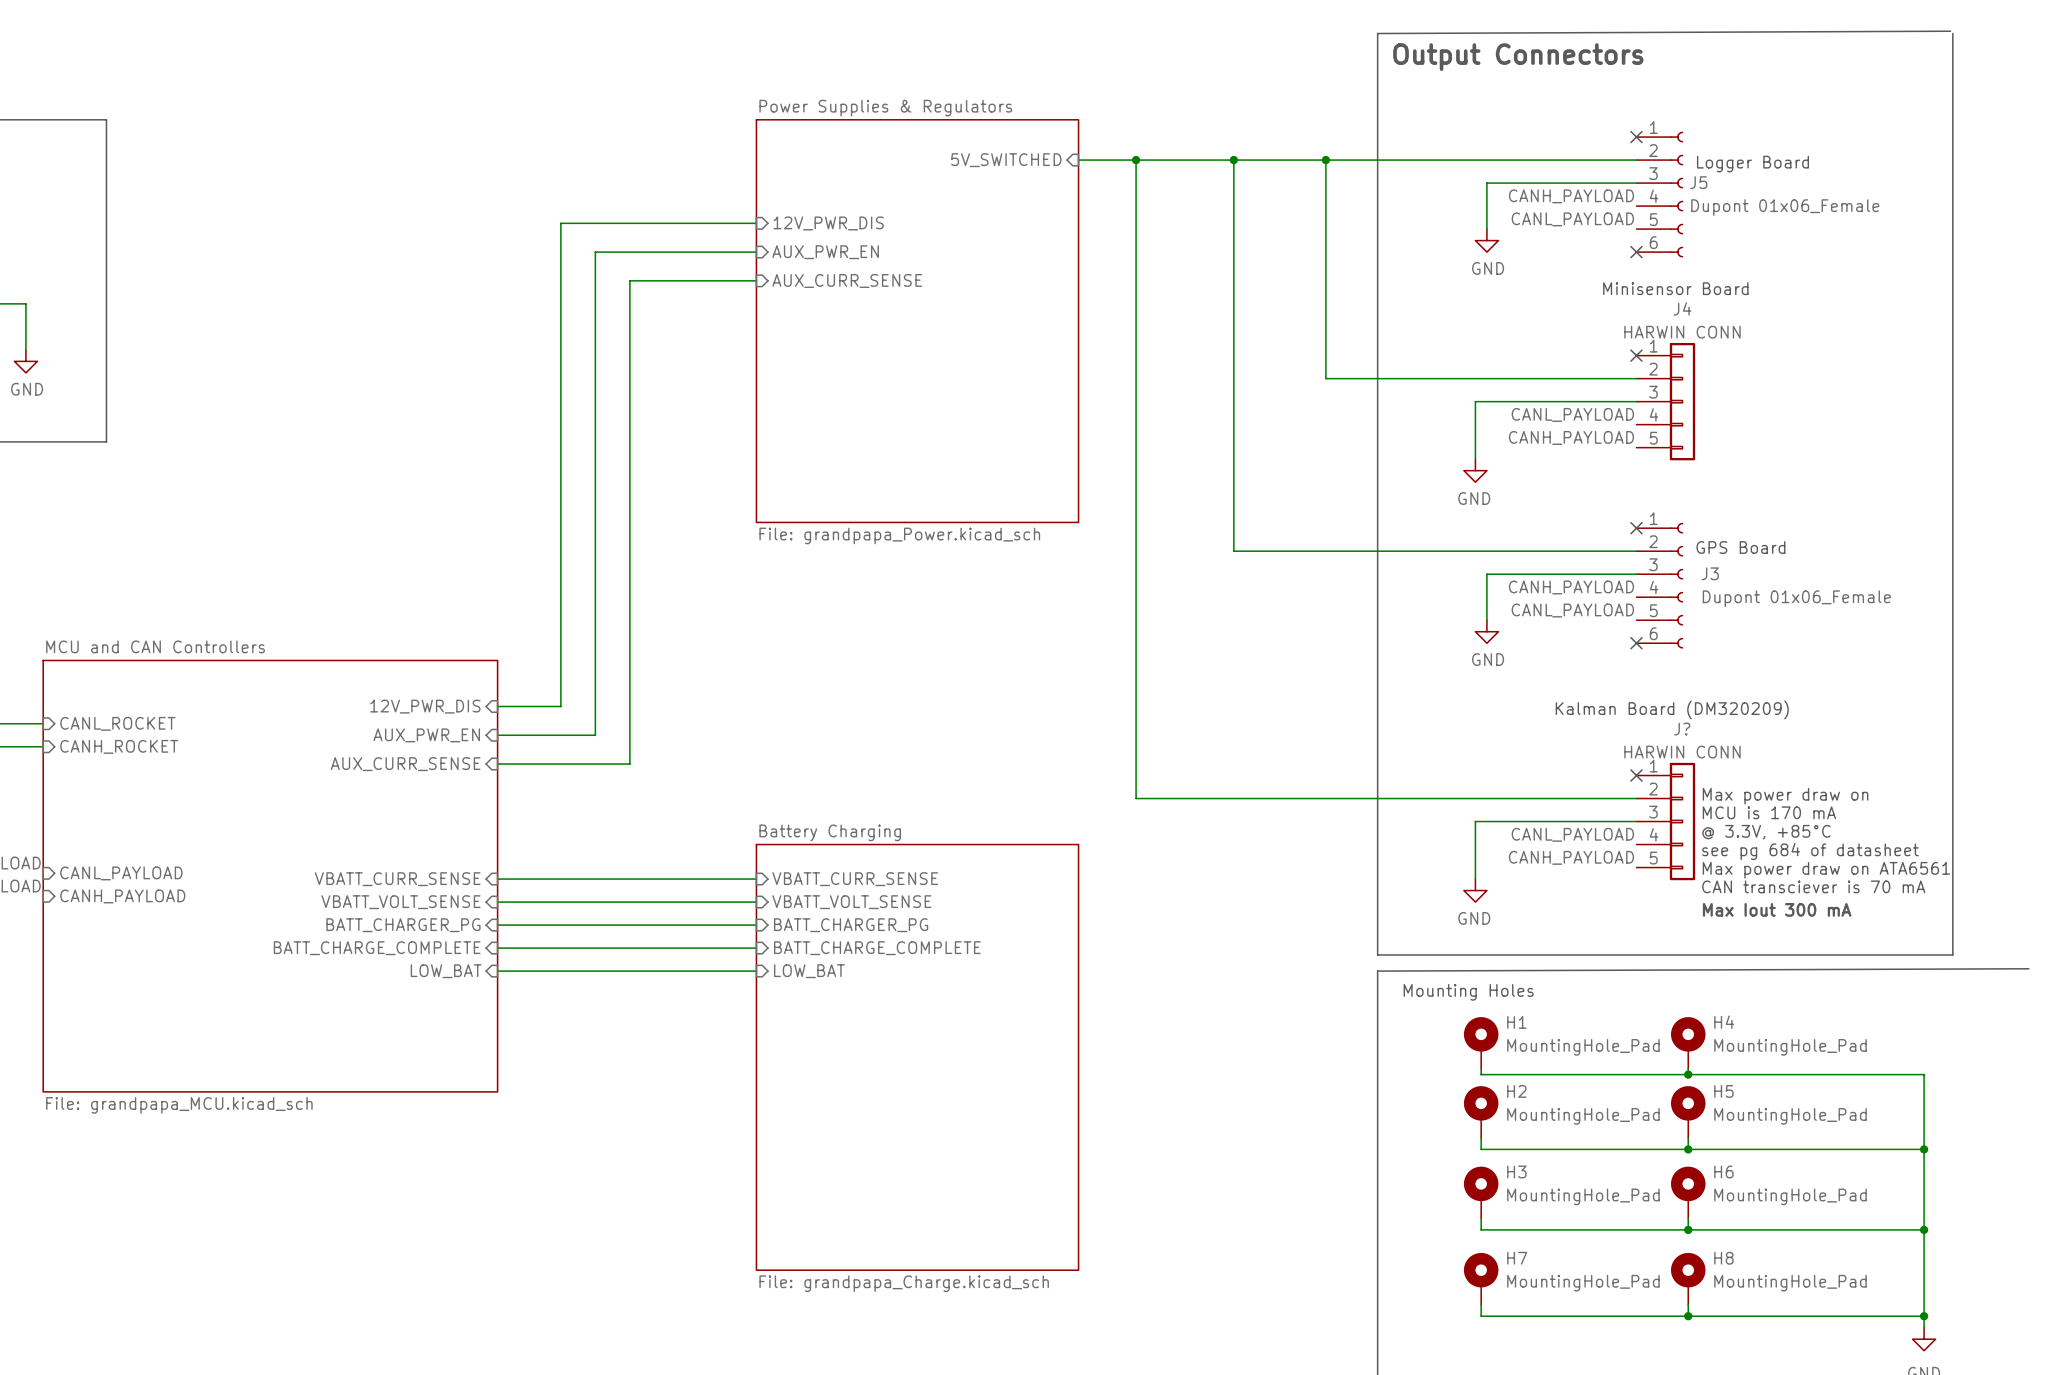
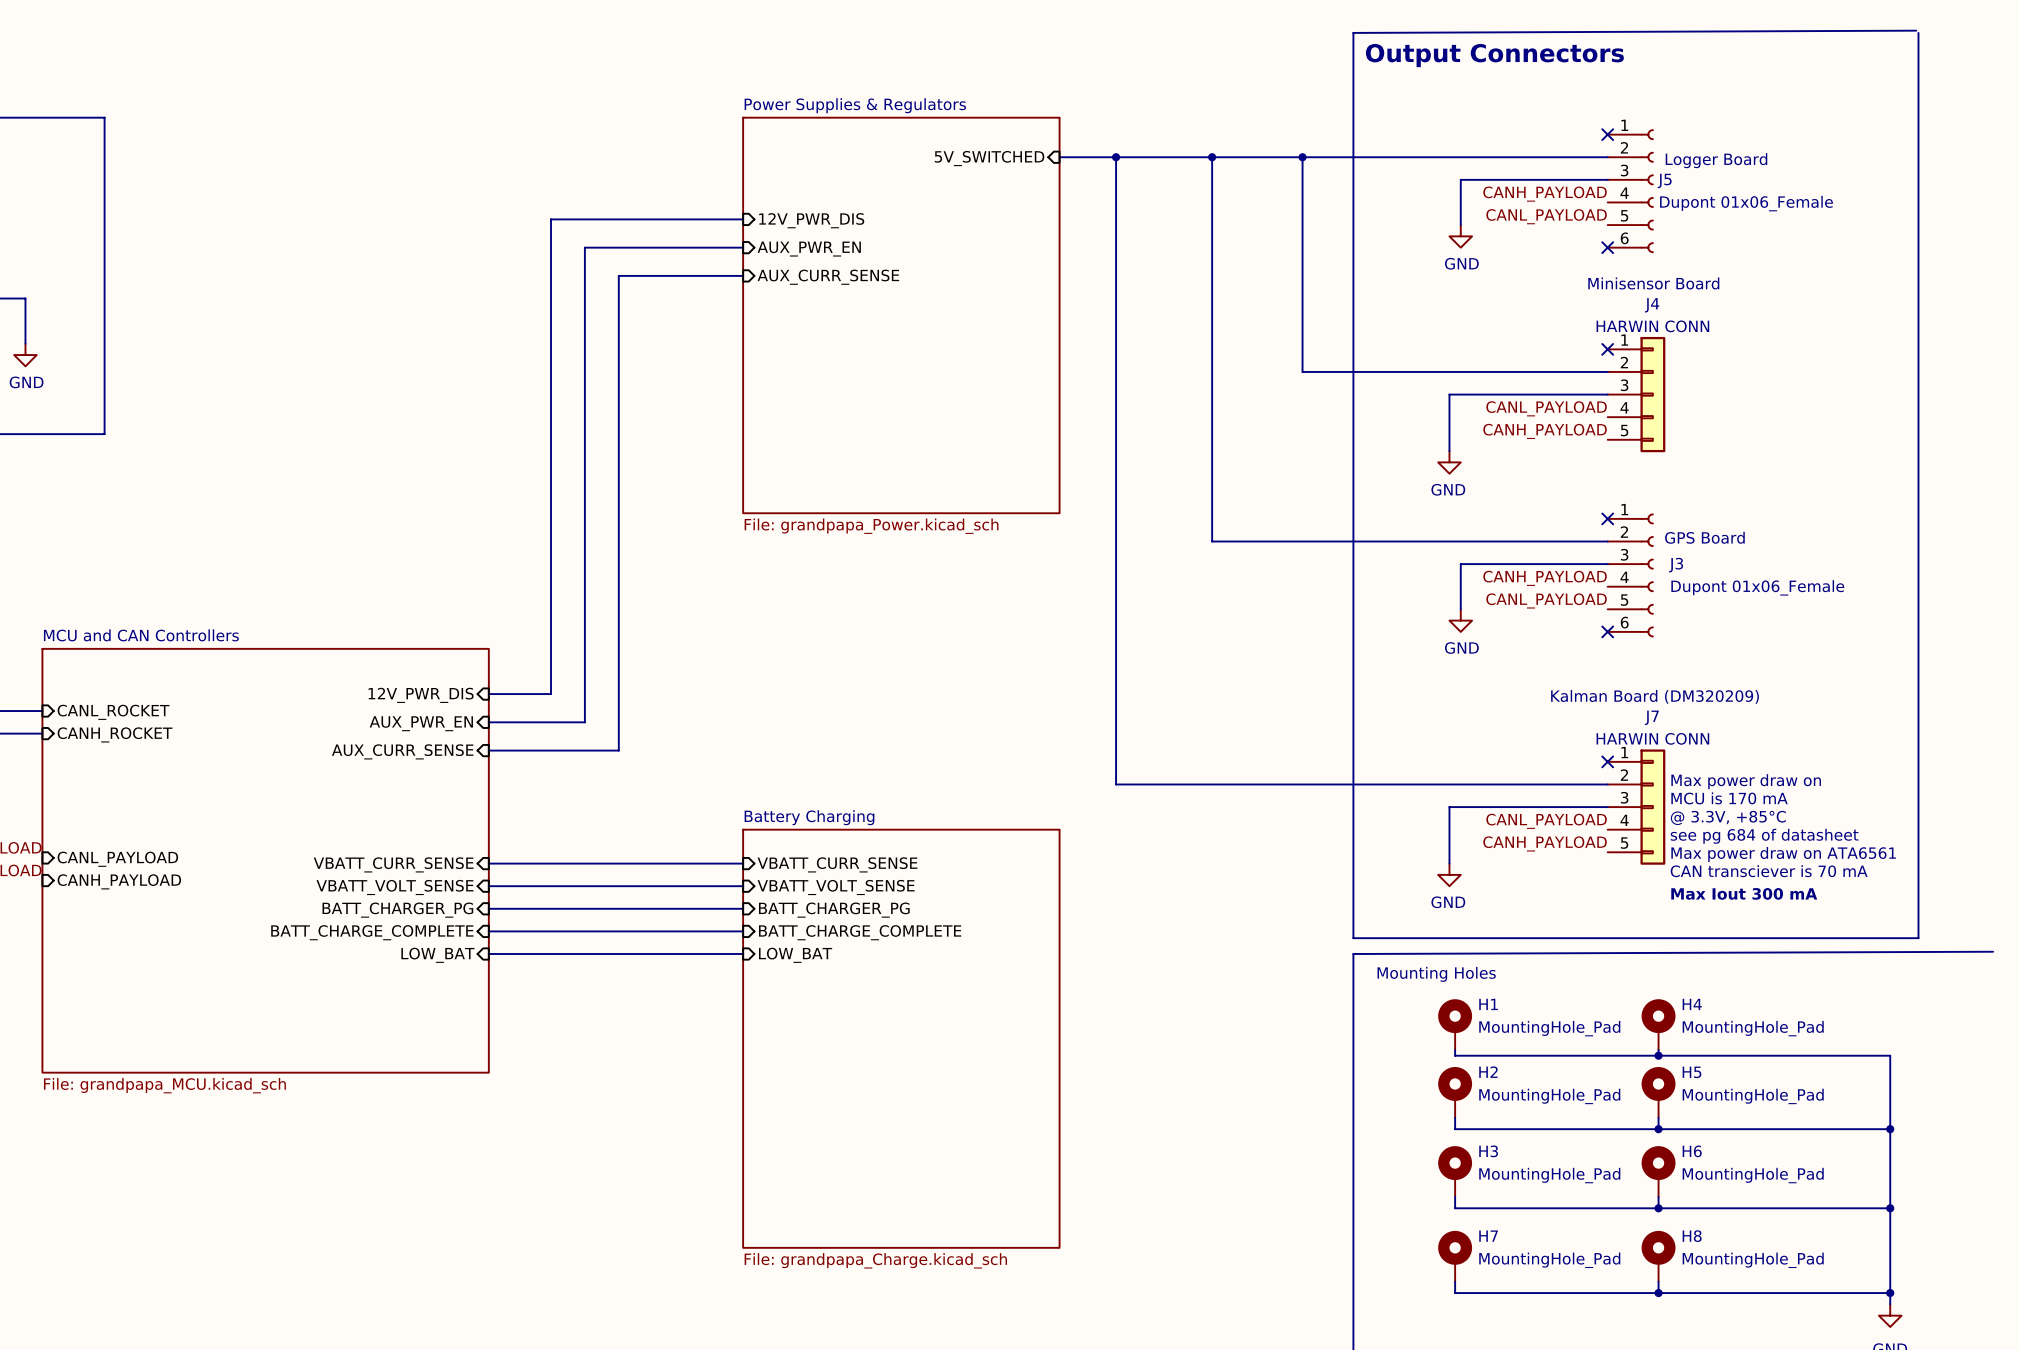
J? name: J? (1682, 729) -> J7 (1651, 717)

